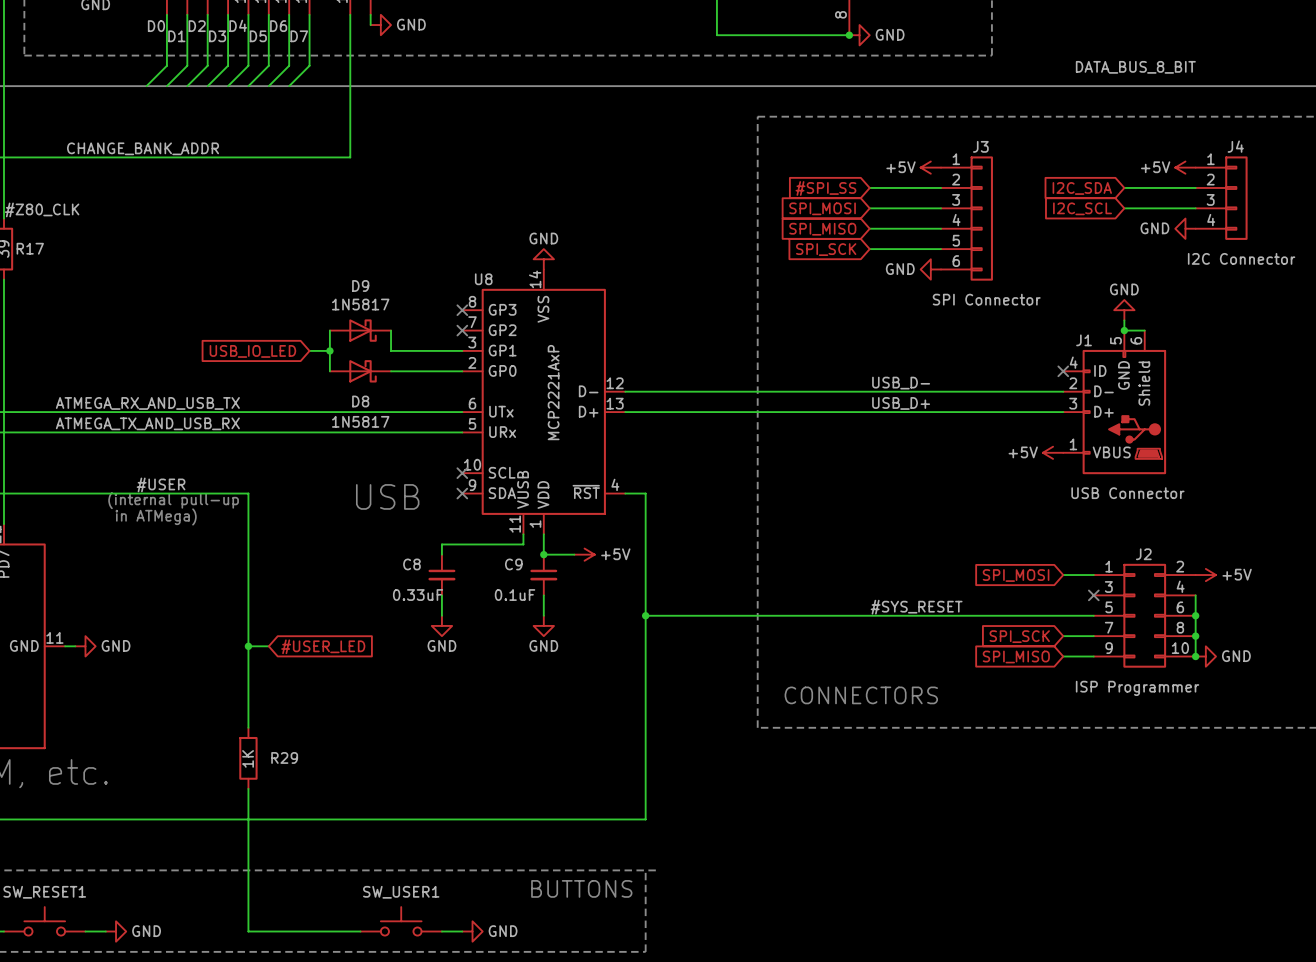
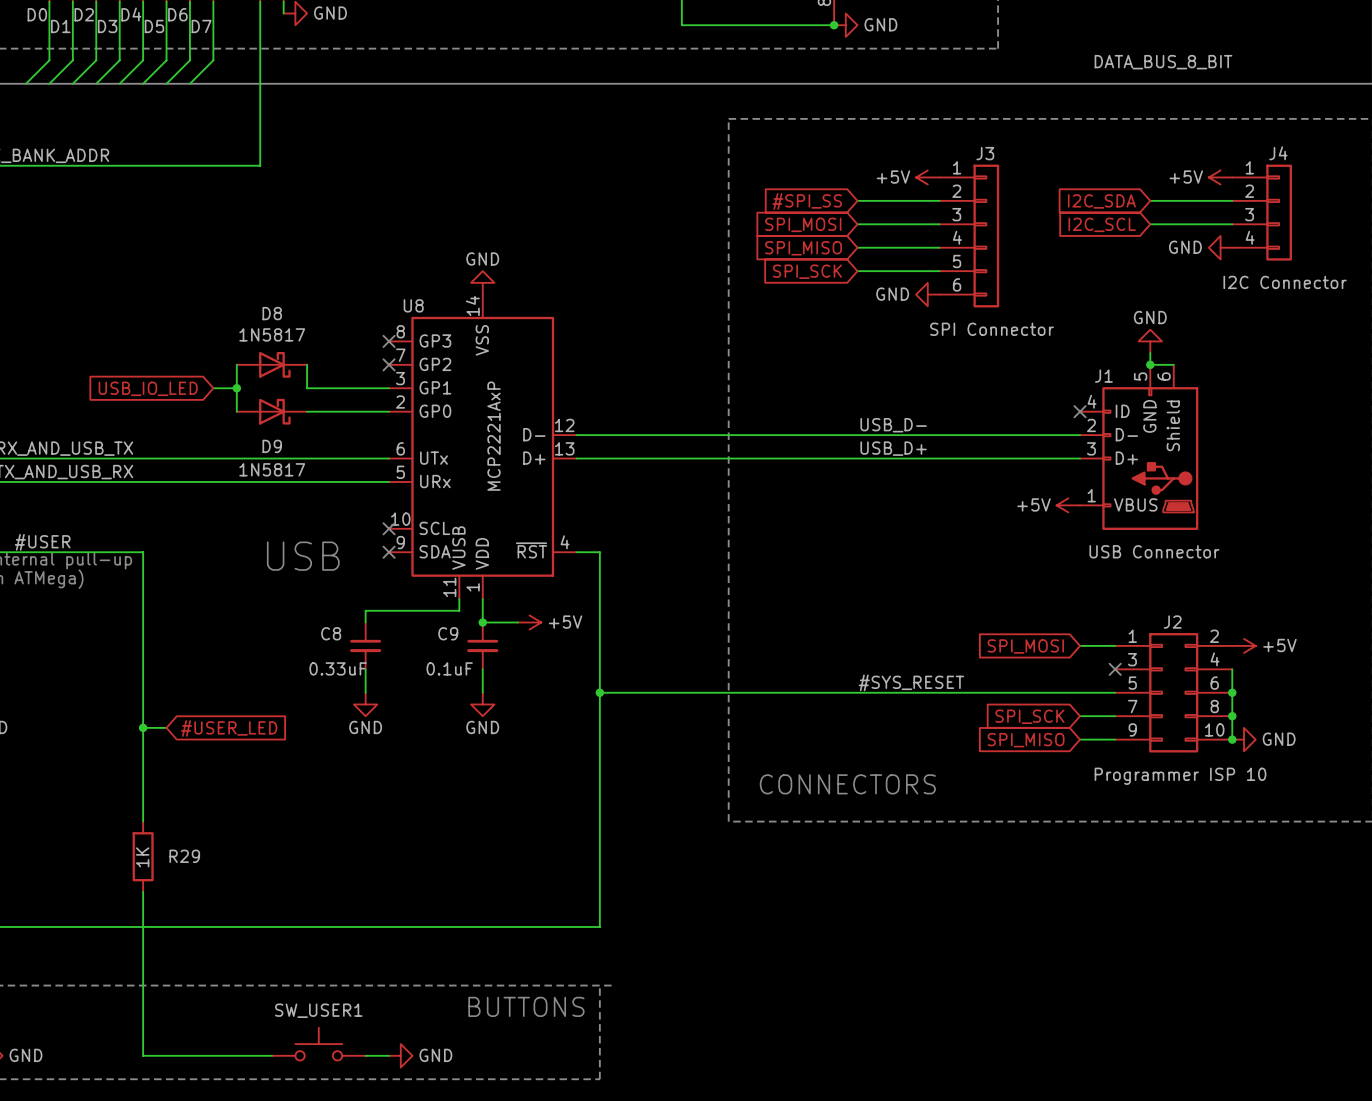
D9 name: D9 (360, 285) -> D8 (272, 313)
D8 name: D8 (360, 401) -> D9 (272, 446)
J2 value: ISP Programmer (1137, 688) -> Programmer ISP 10 (1180, 776)

